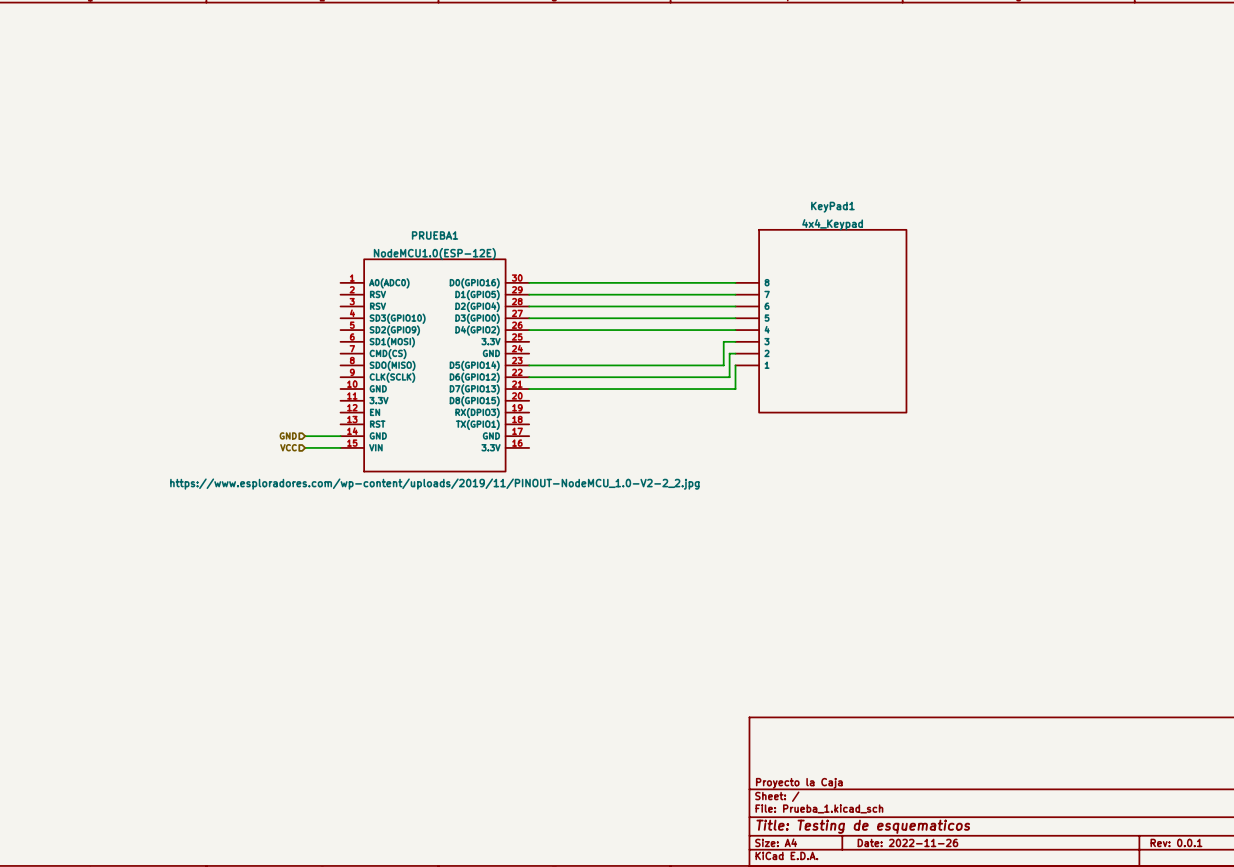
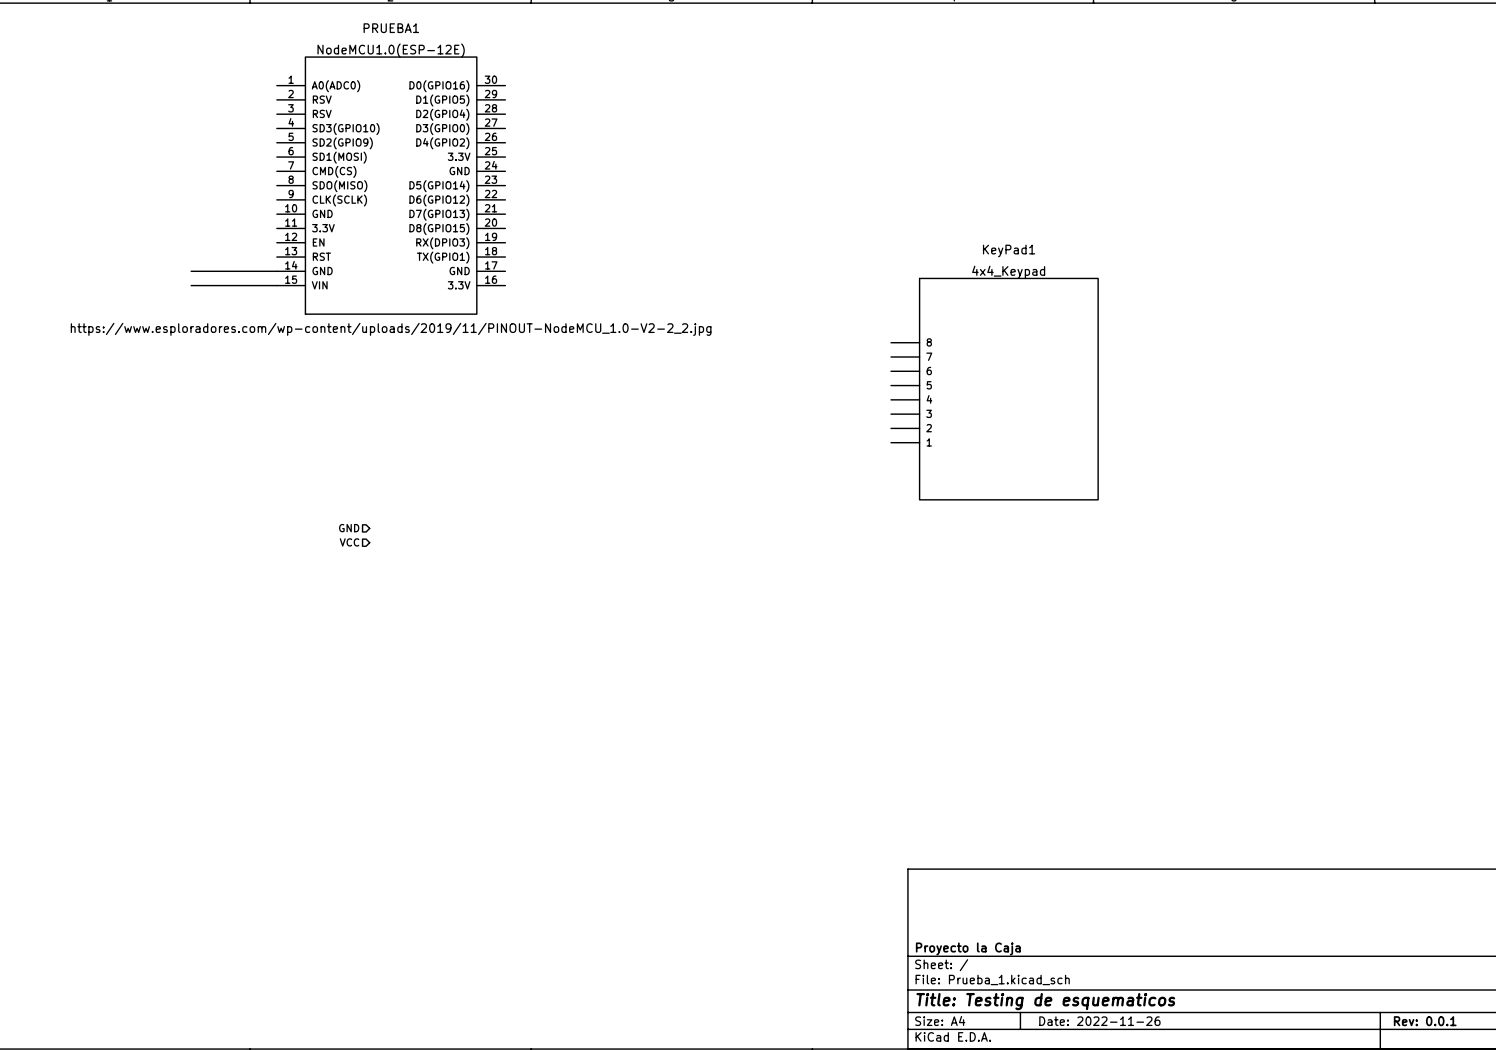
wire: none -> (191, 271) (276, 271)
wire: none -> (191, 285) (276, 285)
wire: (529, 282) (735, 282) -> none
wire: (529, 294) (735, 294) -> none
wire: (529, 306) (735, 306) -> none
wire: (529, 318) (735, 318) -> none
wire: (529, 330) (735, 330) -> none
wire: (735, 341) (723, 341) (723, 365) (529, 365) -> none
wire: (735, 353) (729, 353) (729, 377) (529, 377) -> none
PRUEBA1 position: (434, 365) -> (391, 185)
wire: (735, 365) (735, 389) (529, 389) -> none
wire: (305, 436) (340, 436) -> none
wire: (305, 447) (340, 447) -> none

